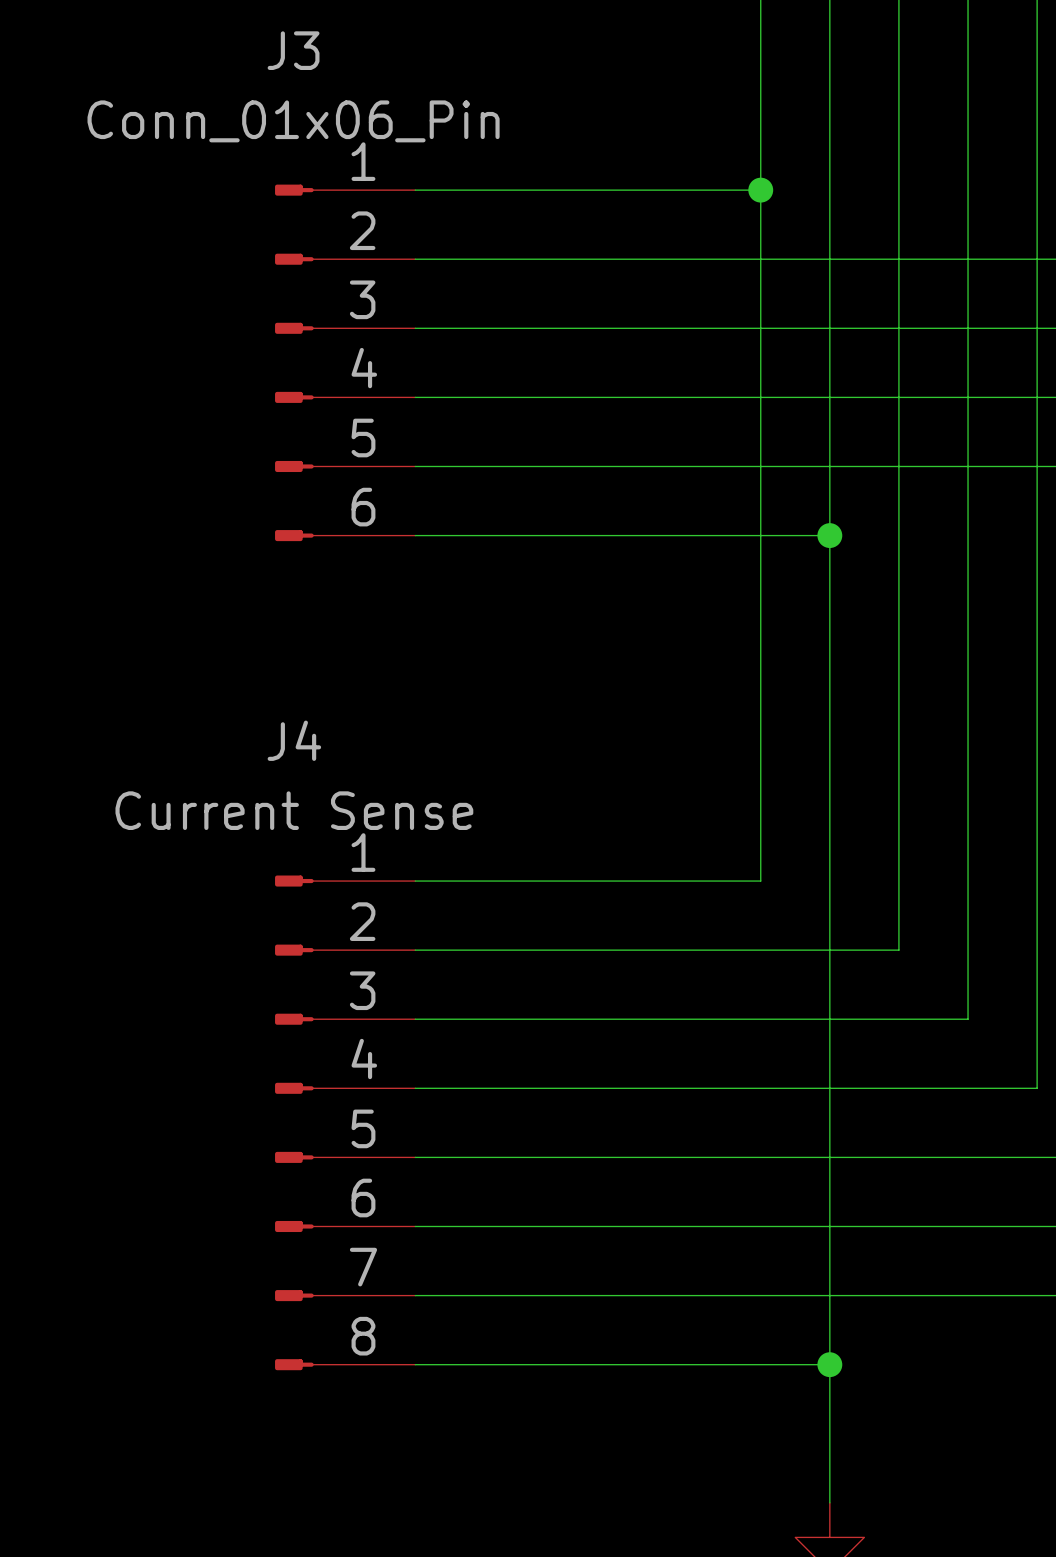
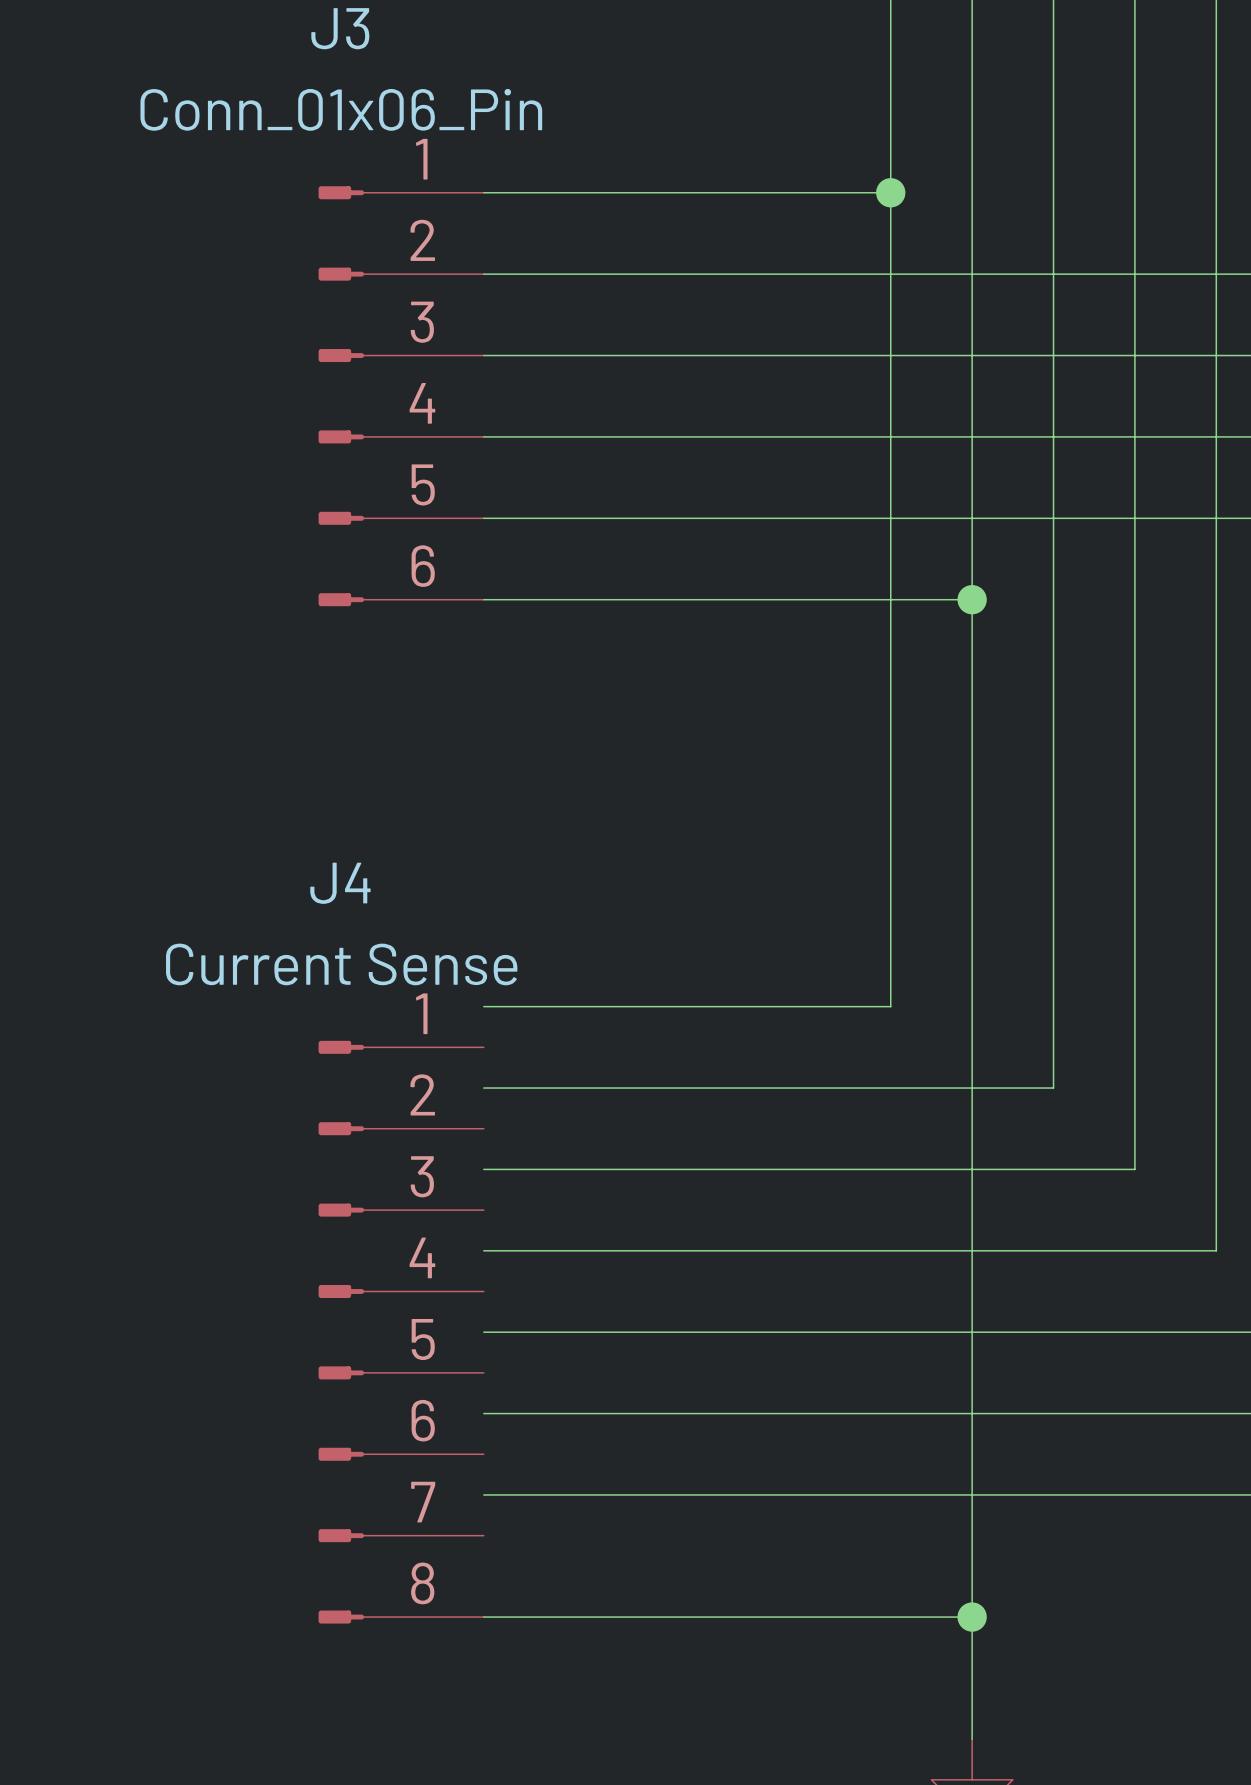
J4 position: (345, 1122) -> (401, 1332)
wire: (415, 1364) (829, 1364) -> (483, 1617) (972, 1617)
junction position: (829, 1364) -> (972, 1617)

